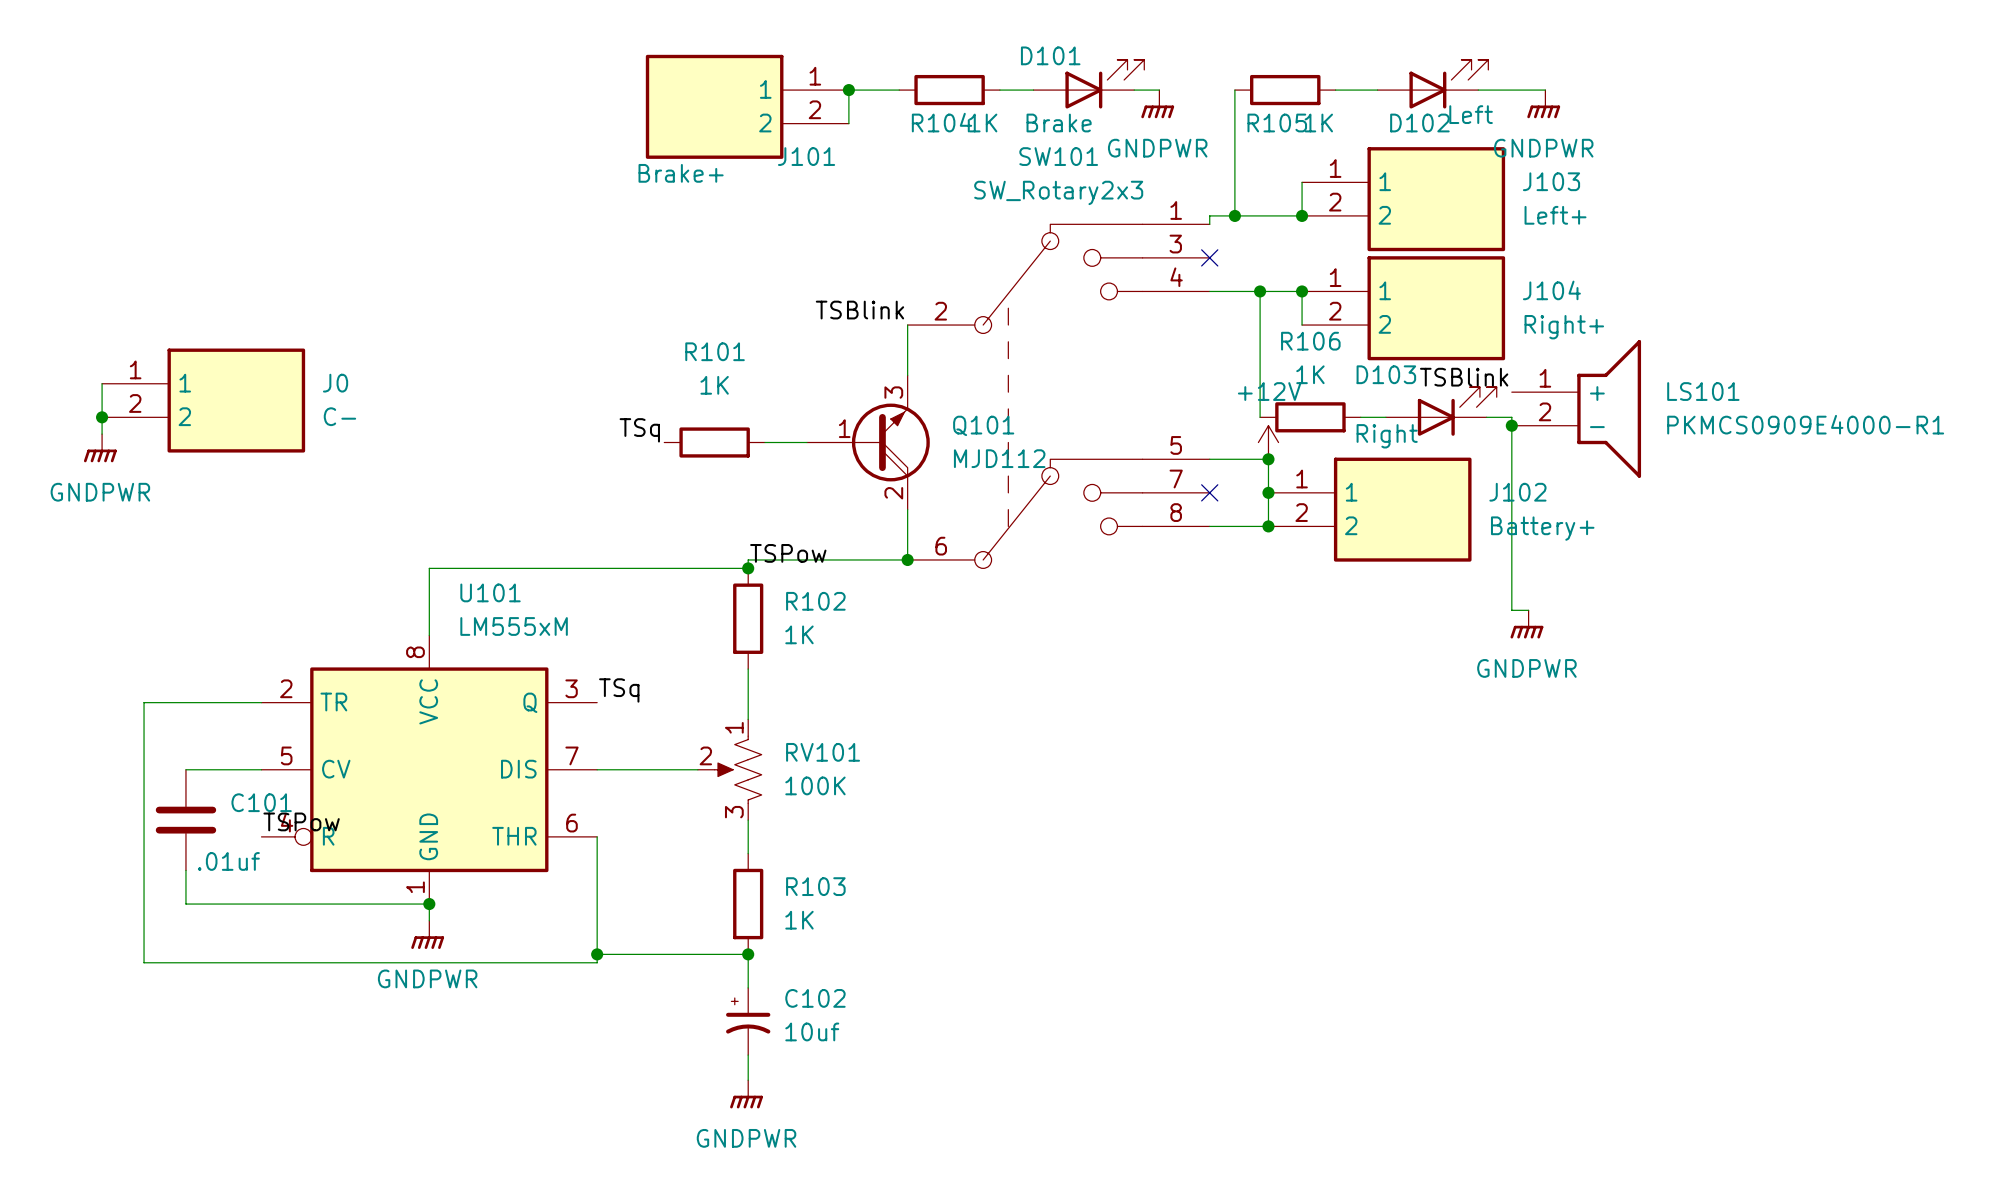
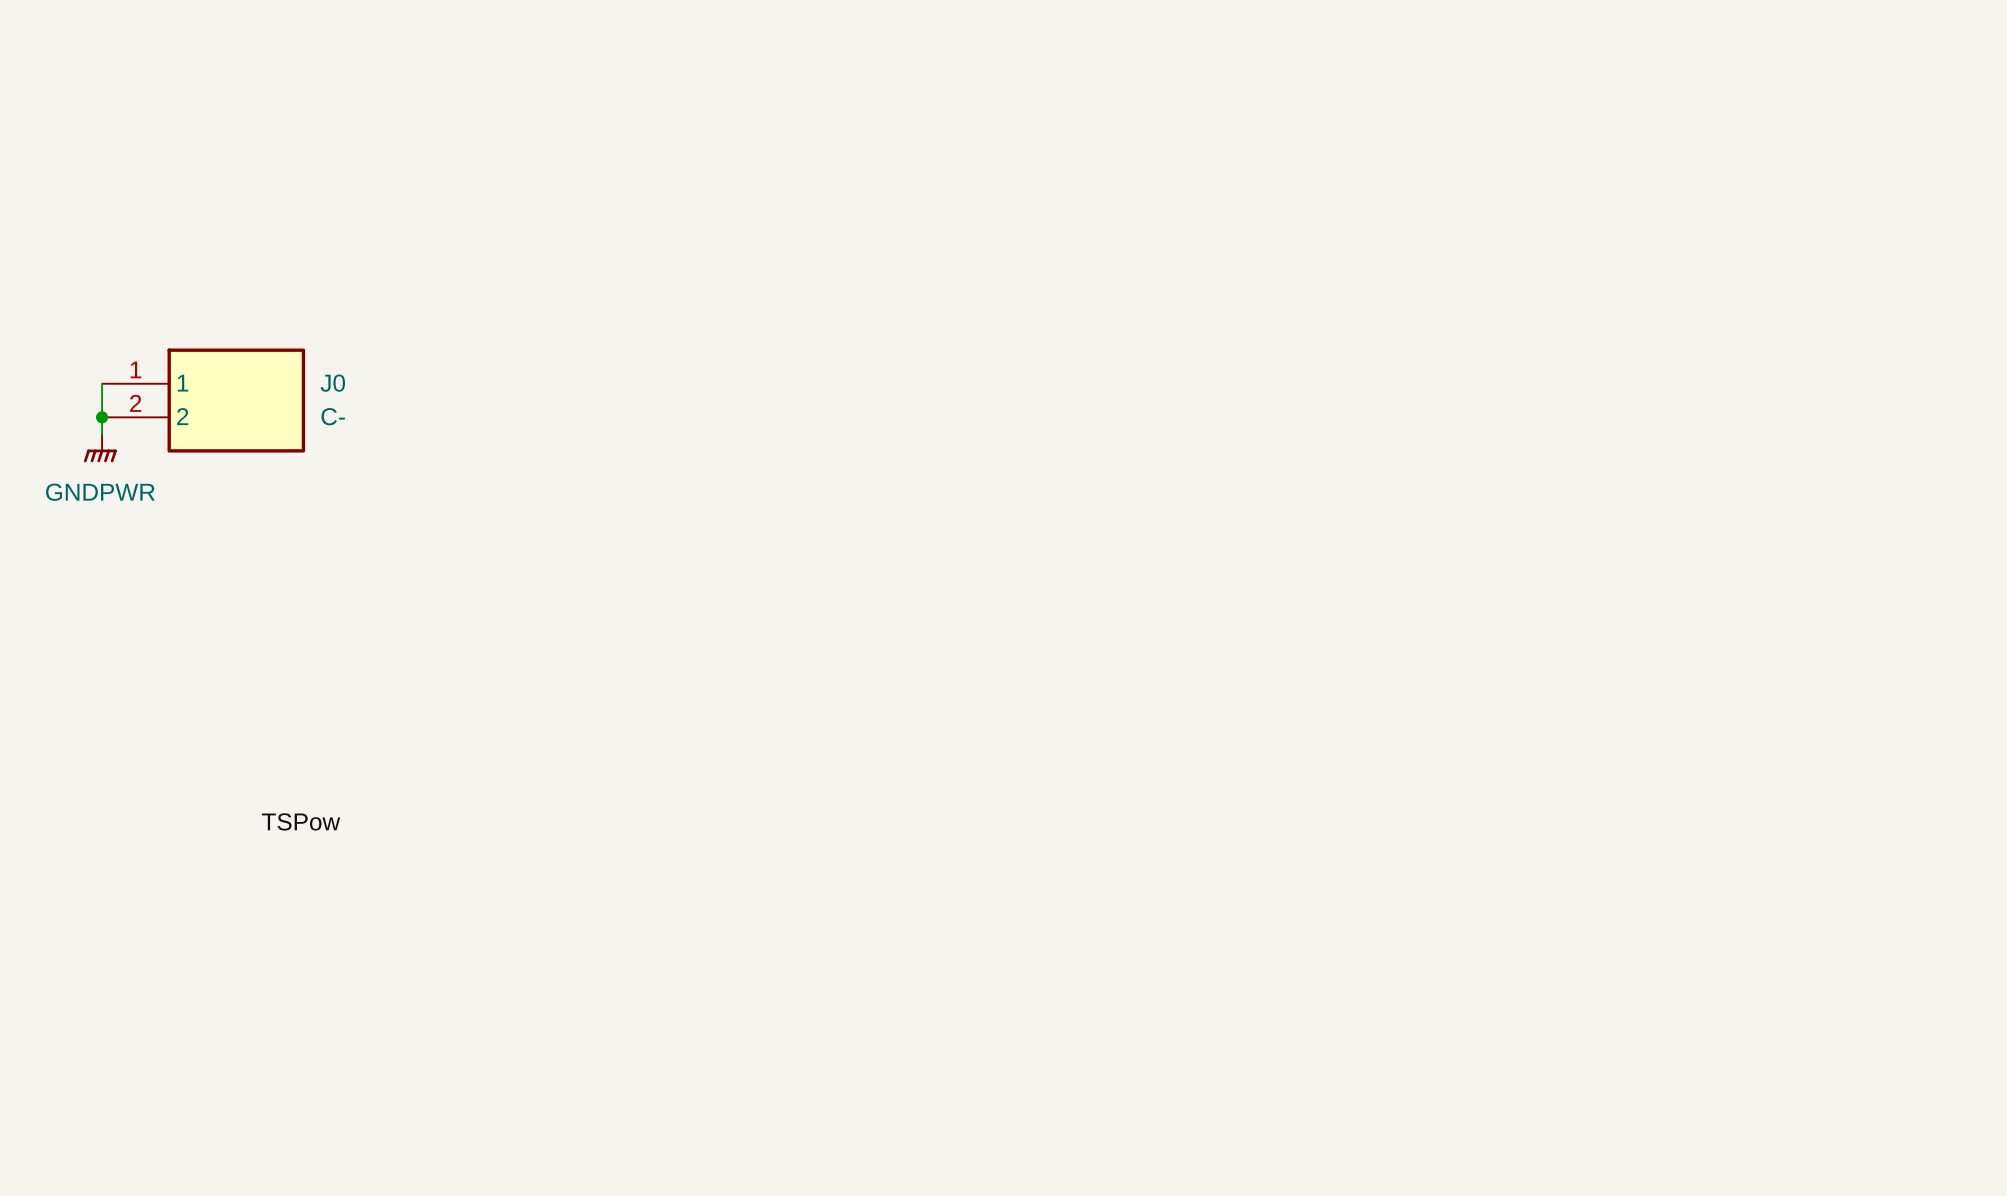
D101: Brake (1088, 84) -> none
D102: Left (1432, 84) -> none
junction: (848, 90) -> none
wire: (899, 90) (848, 90) (848, 123) -> none
R104: 1K (949, 90) -> none
wire: (999, 90) (1033, 90) -> none
wire: (1134, 90) (1159, 90) -> none
wire: (1234, 90) (1234, 215) -> none
R105: 1K (1285, 90) -> none
wire: (1335, 90) (1377, 90) -> none
wire: (1478, 90) (1545, 90) -> none
power symbol: GNDPWR (1157, 104) -> none
power symbol: GNDPWR (1543, 104) -> none
J101: Brake+ (747, 106) -> none
wire: (1302, 182) (1302, 215) (1209, 215) (1209, 224) -> none
J103: Left+ (1403, 199) -> none
junction: (1234, 215) -> none
junction: (1302, 215) -> none
no-connect mark: (1209, 257) -> none
wire: (1209, 291) (1302, 291) (1302, 325) -> none
wire: (1260, 291) (1260, 417) -> none
junction: (1260, 291) -> none
junction: (1302, 291) -> none
J104: Right+ (1403, 308) -> none
label: TSBlink (859, 310) -> none
wire: (907, 325) (907, 375) -> none
label: TSBlink (1464, 377) -> none
SW101: SW_Rotary2x3 (1058, 396) -> none
LS101: PKMCS0909E4000-R1 (1576, 408) -> none
D103: Right (1441, 411) -> none
R106: 1K (1310, 417) -> none
wire: (1360, 417) (1385, 417) -> none
wire: (1486, 417) (1511, 417) (1511, 610) (1528, 610) -> none
junction: (1511, 425) -> none
label: TSq (639, 430) -> none
R101: 1K (714, 442) -> none
wire: (764, 442) (806, 442) -> none
Q101: MJD112 (868, 442) -> none
power symbol: +12V (1268, 442) -> none
wire: (1209, 459) (1268, 459) (1268, 526) (1209, 526) -> none
junction: (1268, 459) -> none
no-connect mark: (1209, 492) -> none
junction: (1268, 492) -> none
wire: (907, 509) (907, 559) (748, 559) (748, 568) (429, 568) (429, 635) -> none
J102: Battery+ (1370, 509) -> none
junction: (1268, 526) -> none
label: TSPow (788, 553) -> none
junction: (907, 559) -> none
junction: (748, 568) -> none
R102: 1K (748, 618) -> none
power symbol: GNDPWR (1526, 624) -> none
wire: (748, 669) (748, 719) -> none
label: TSq (619, 690) -> none
wire: (261, 702) (144, 702) (144, 962) (597, 962) (597, 836) -> none
wire: (185, 769) (261, 769) -> none
U101: LM555xM (429, 769) -> none
wire: (597, 769) (697, 769) -> none
RV101: 100K (729, 769) -> none
C101: .01uf (185, 820) -> none
wire: (748, 820) (748, 853) -> none
wire: (185, 870) (185, 904) (429, 904) (429, 920) -> none
junction: (429, 904) -> none
R103: 1K (748, 904) -> none
power symbol: GNDPWR (427, 934) -> none
wire: (597, 954) (748, 954) (748, 987) -> none
junction: (597, 954) -> none
junction: (748, 954) -> none
C102: 10uf (748, 1021) -> none
wire: (748, 1055) (748, 1080) -> none
power symbol: GNDPWR (746, 1094) -> none

